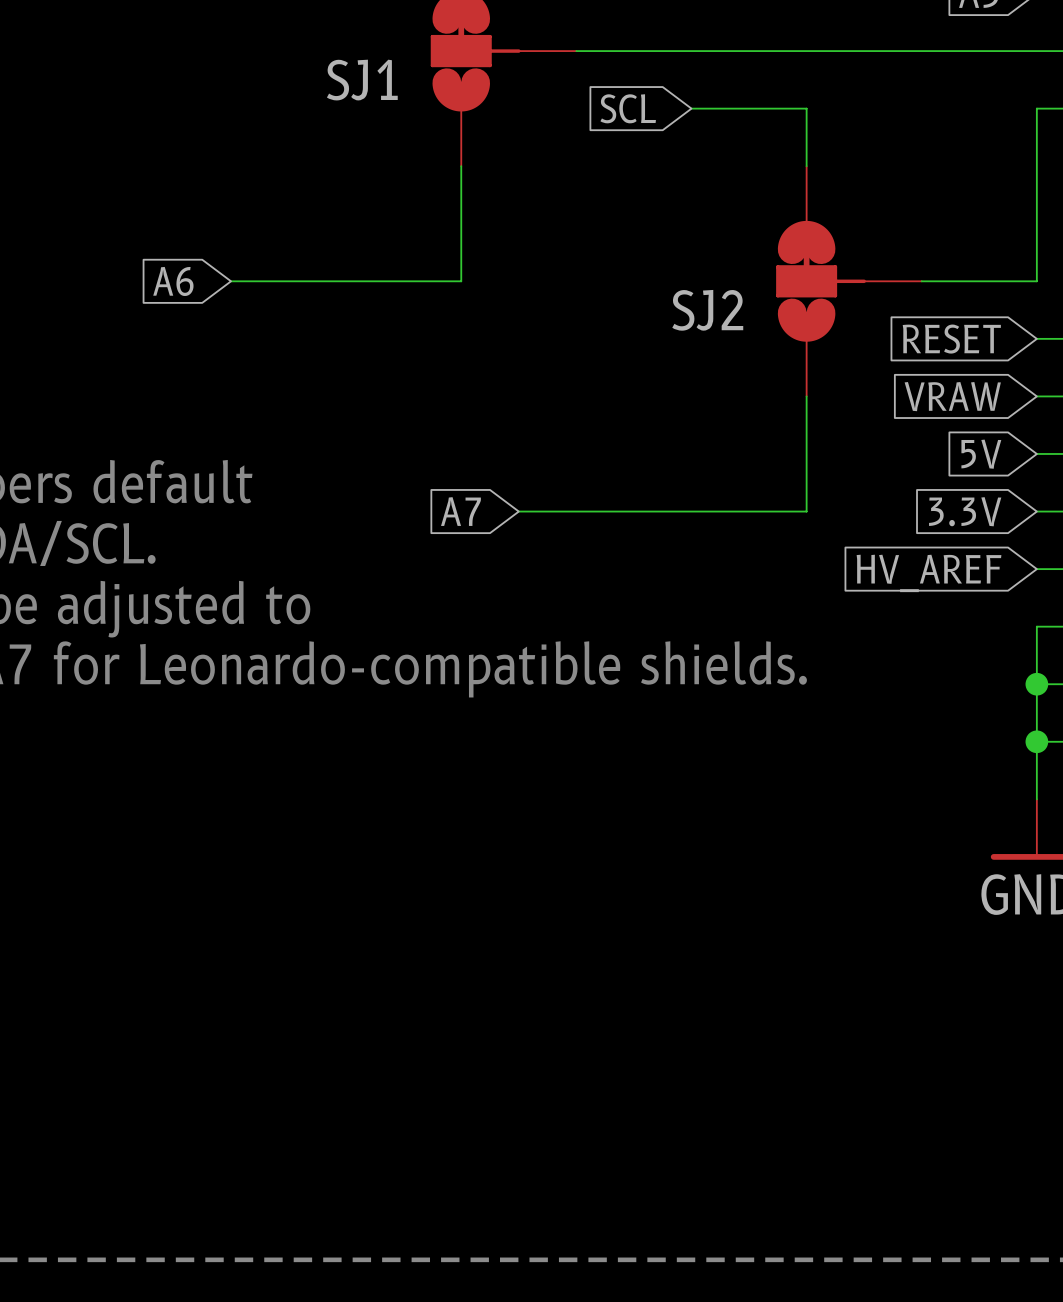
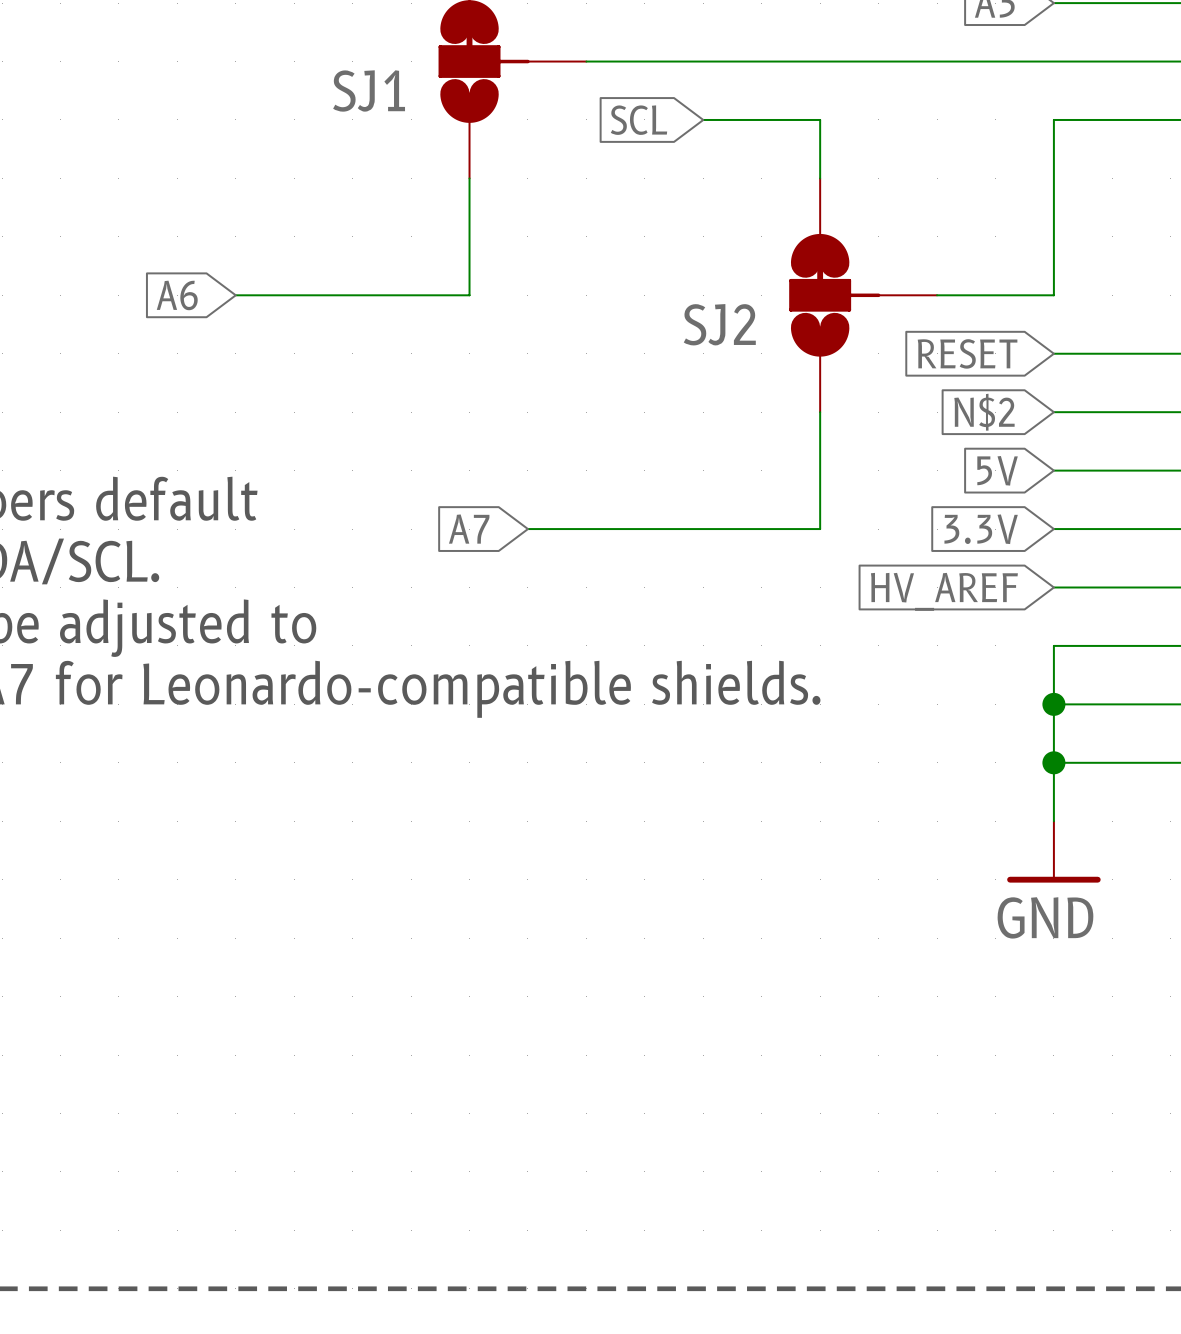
global label: VRAW (952, 396) -> N$2 (984, 412)

